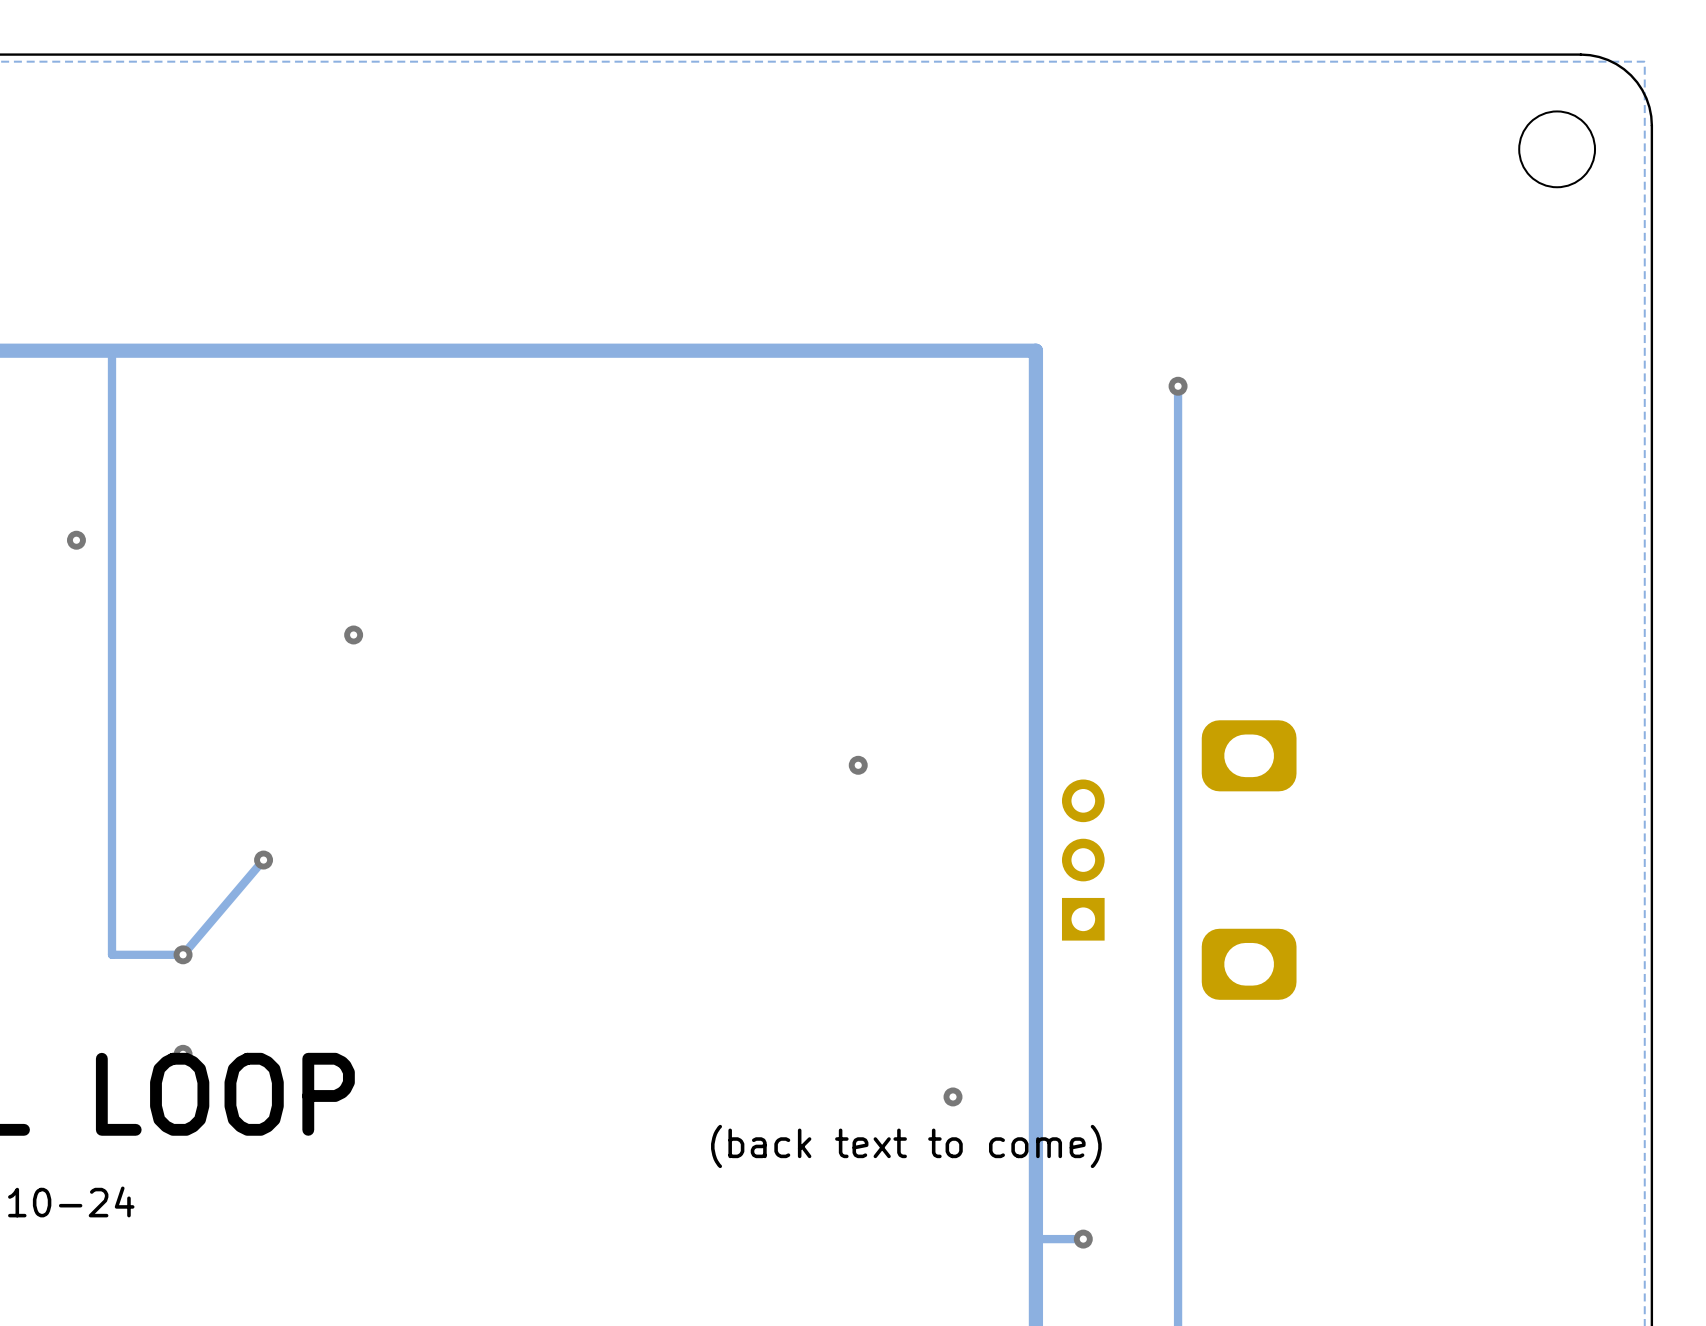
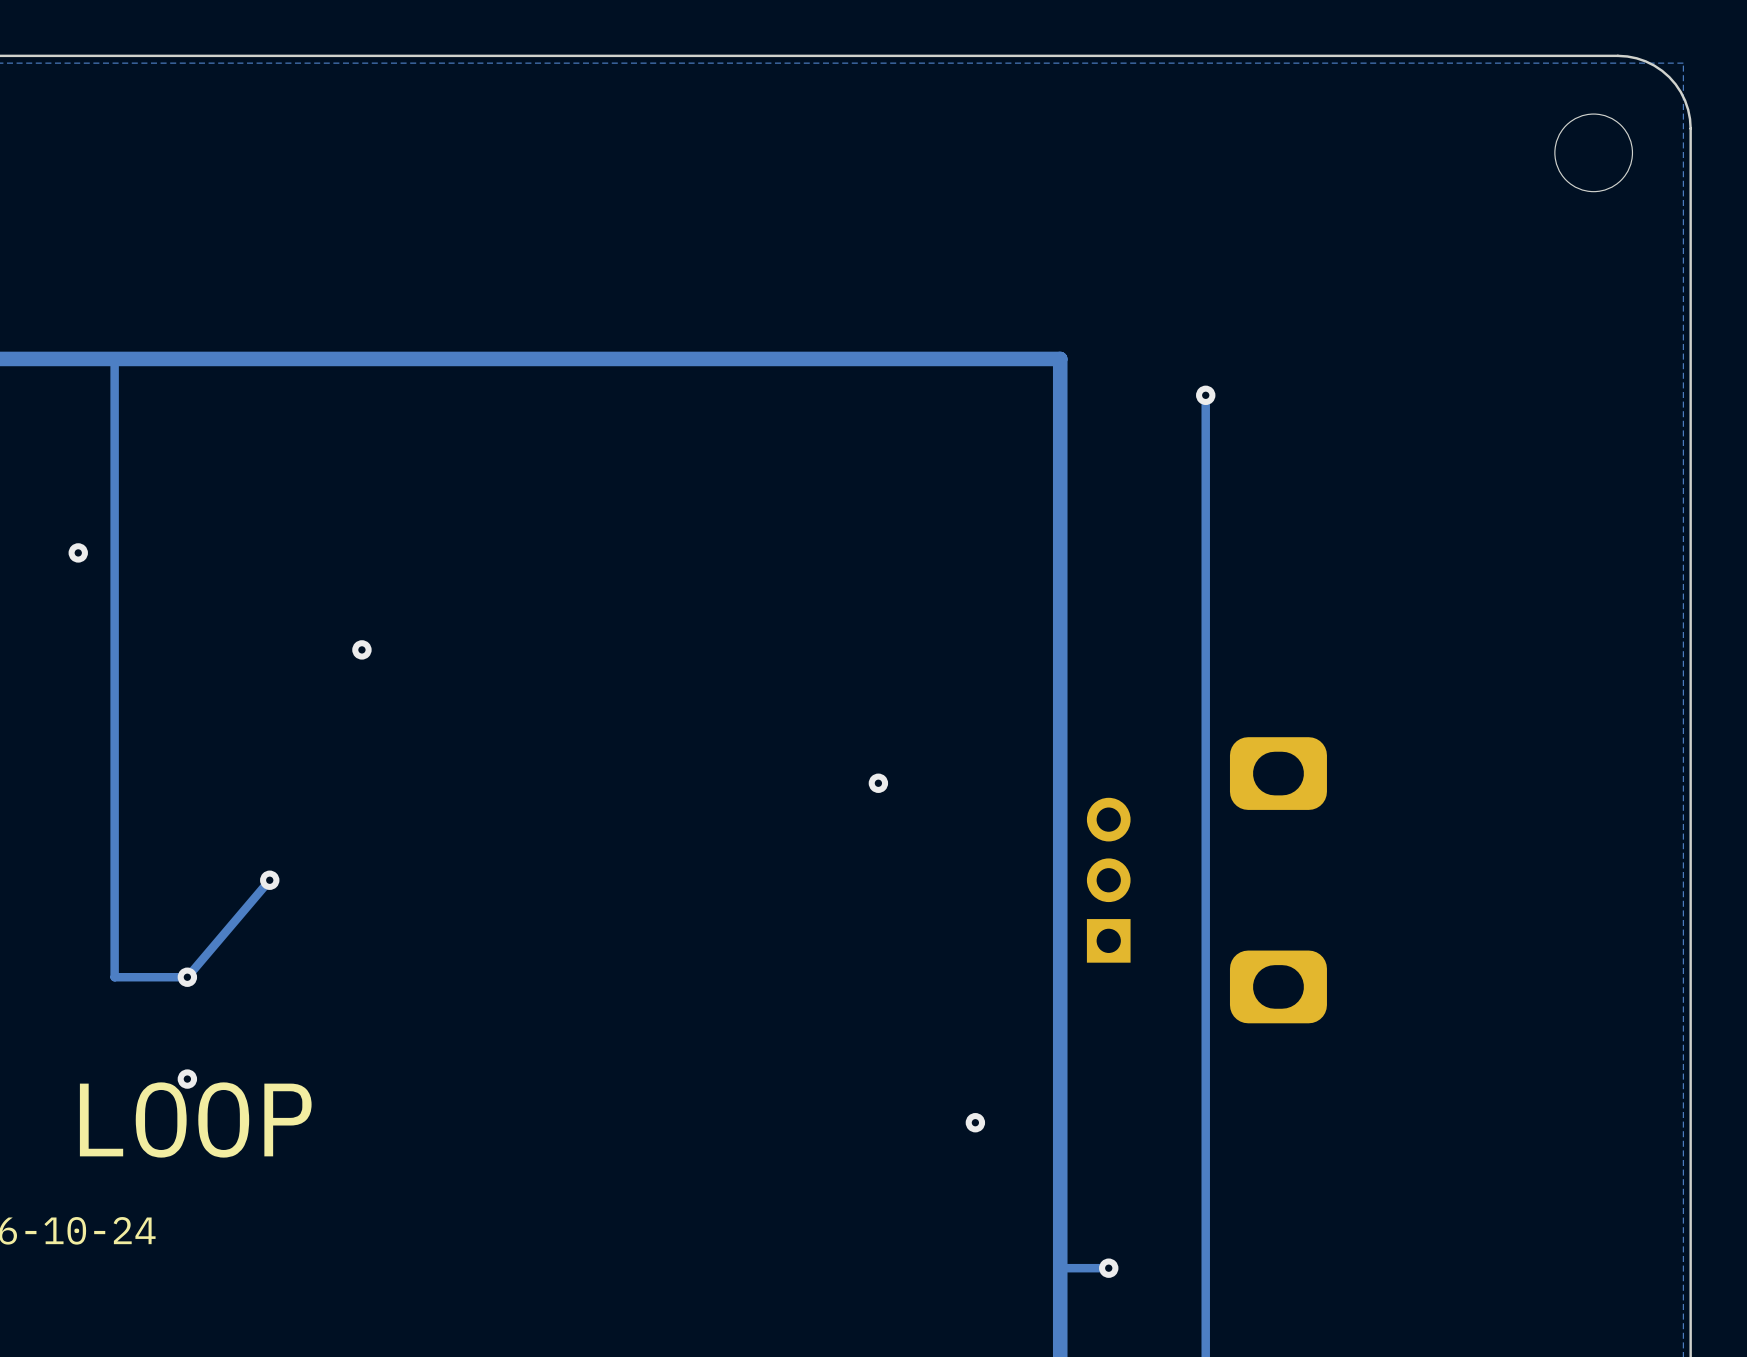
text: (back text to come) (906, 1146) -> none

